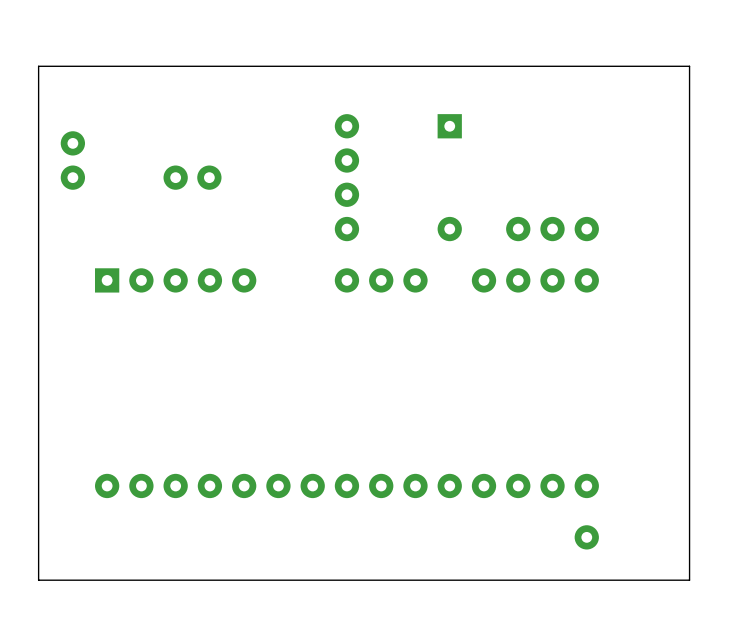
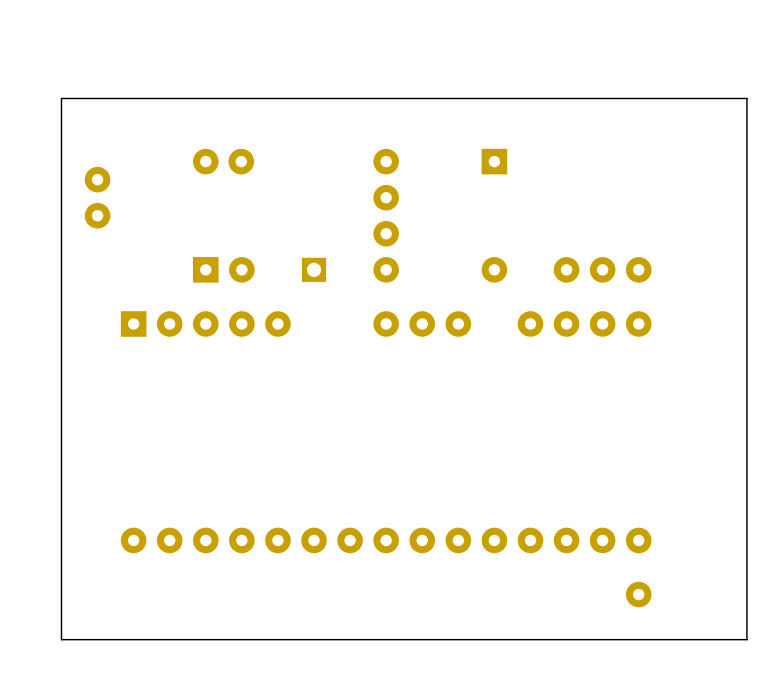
part position: (192, 177) -> (223, 161)
part: none -> (223, 269)
part: none -> (314, 269)

